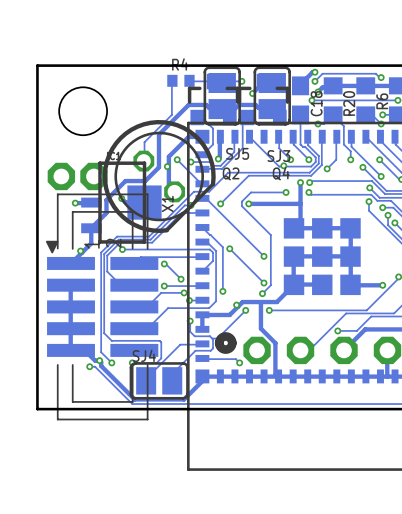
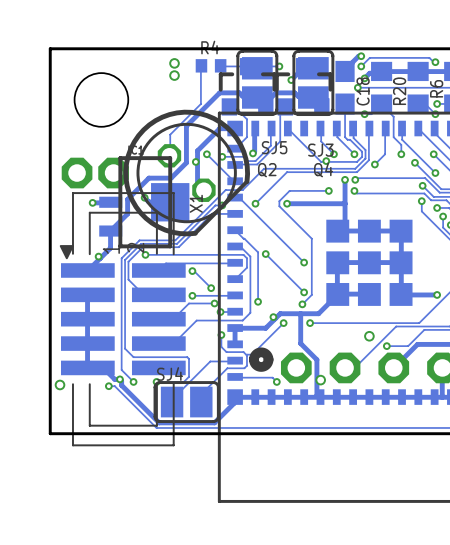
via: none -> (174, 63)
via: none -> (174, 75)
via: none -> (369, 336)
via: none -> (320, 380)
via: none -> (60, 384)

